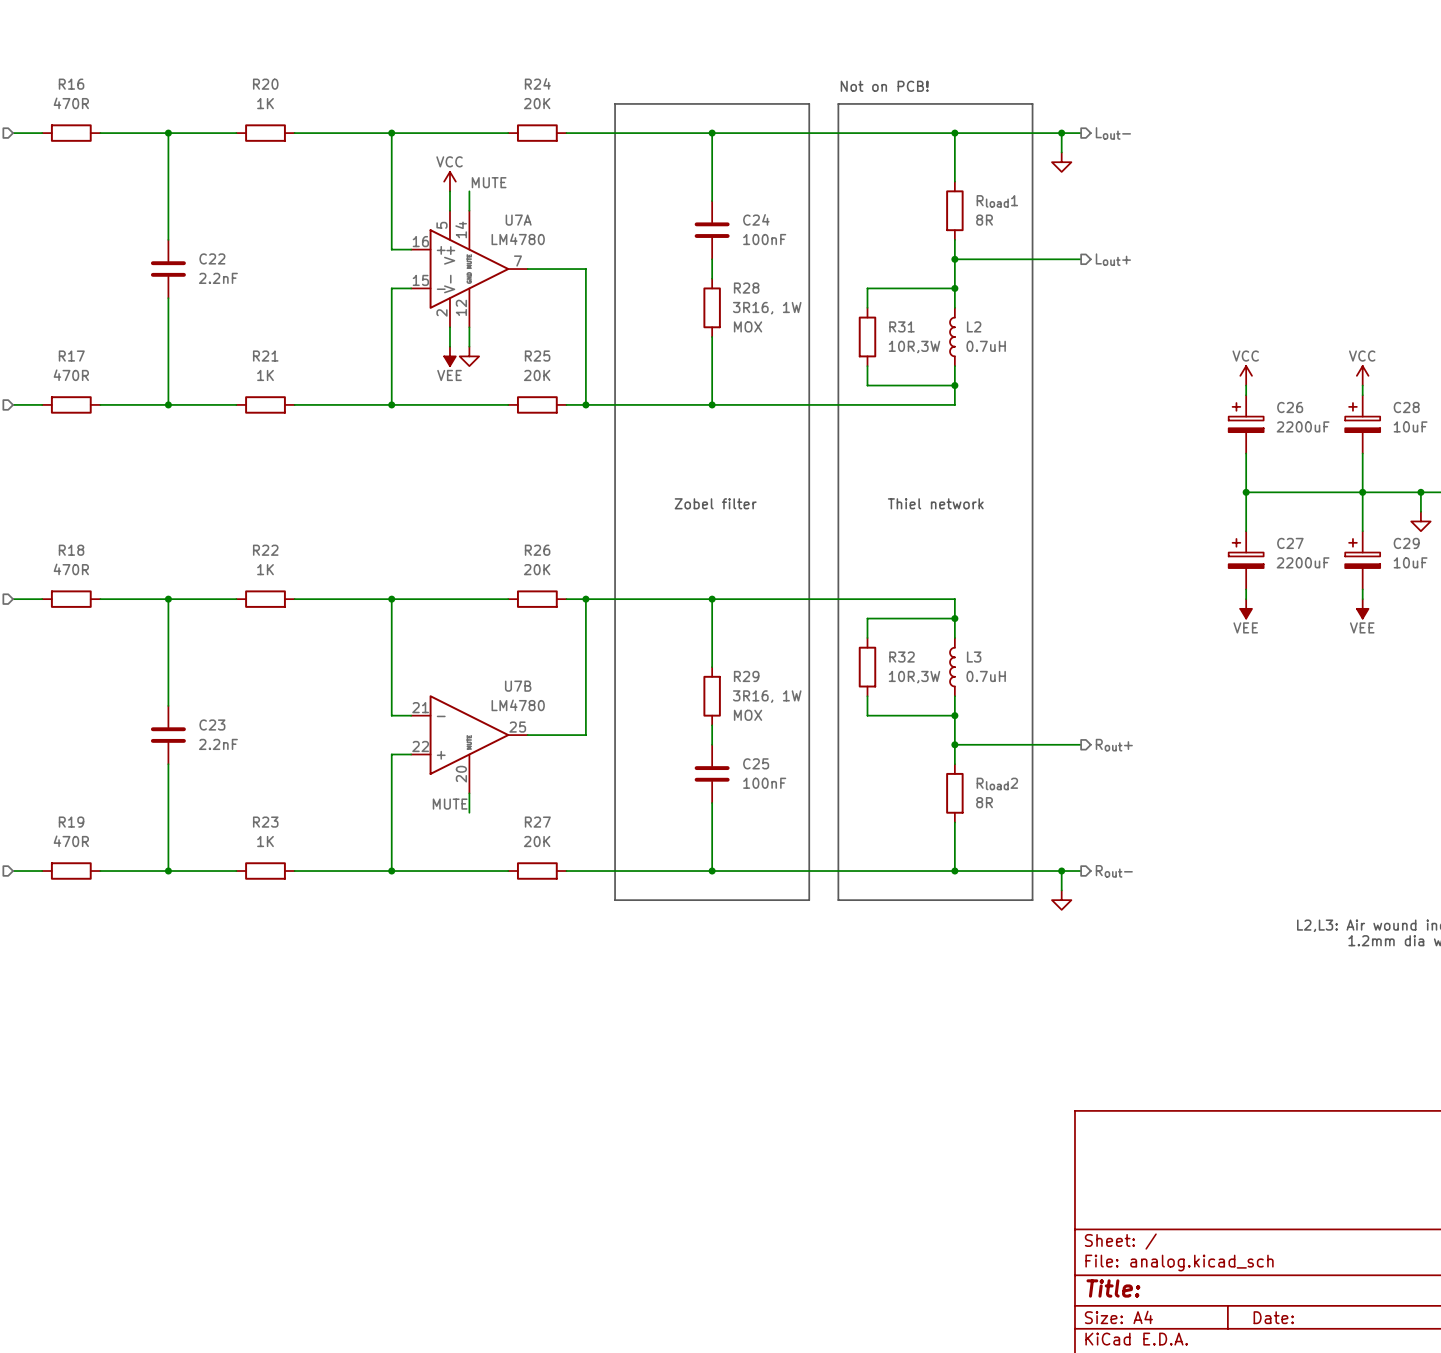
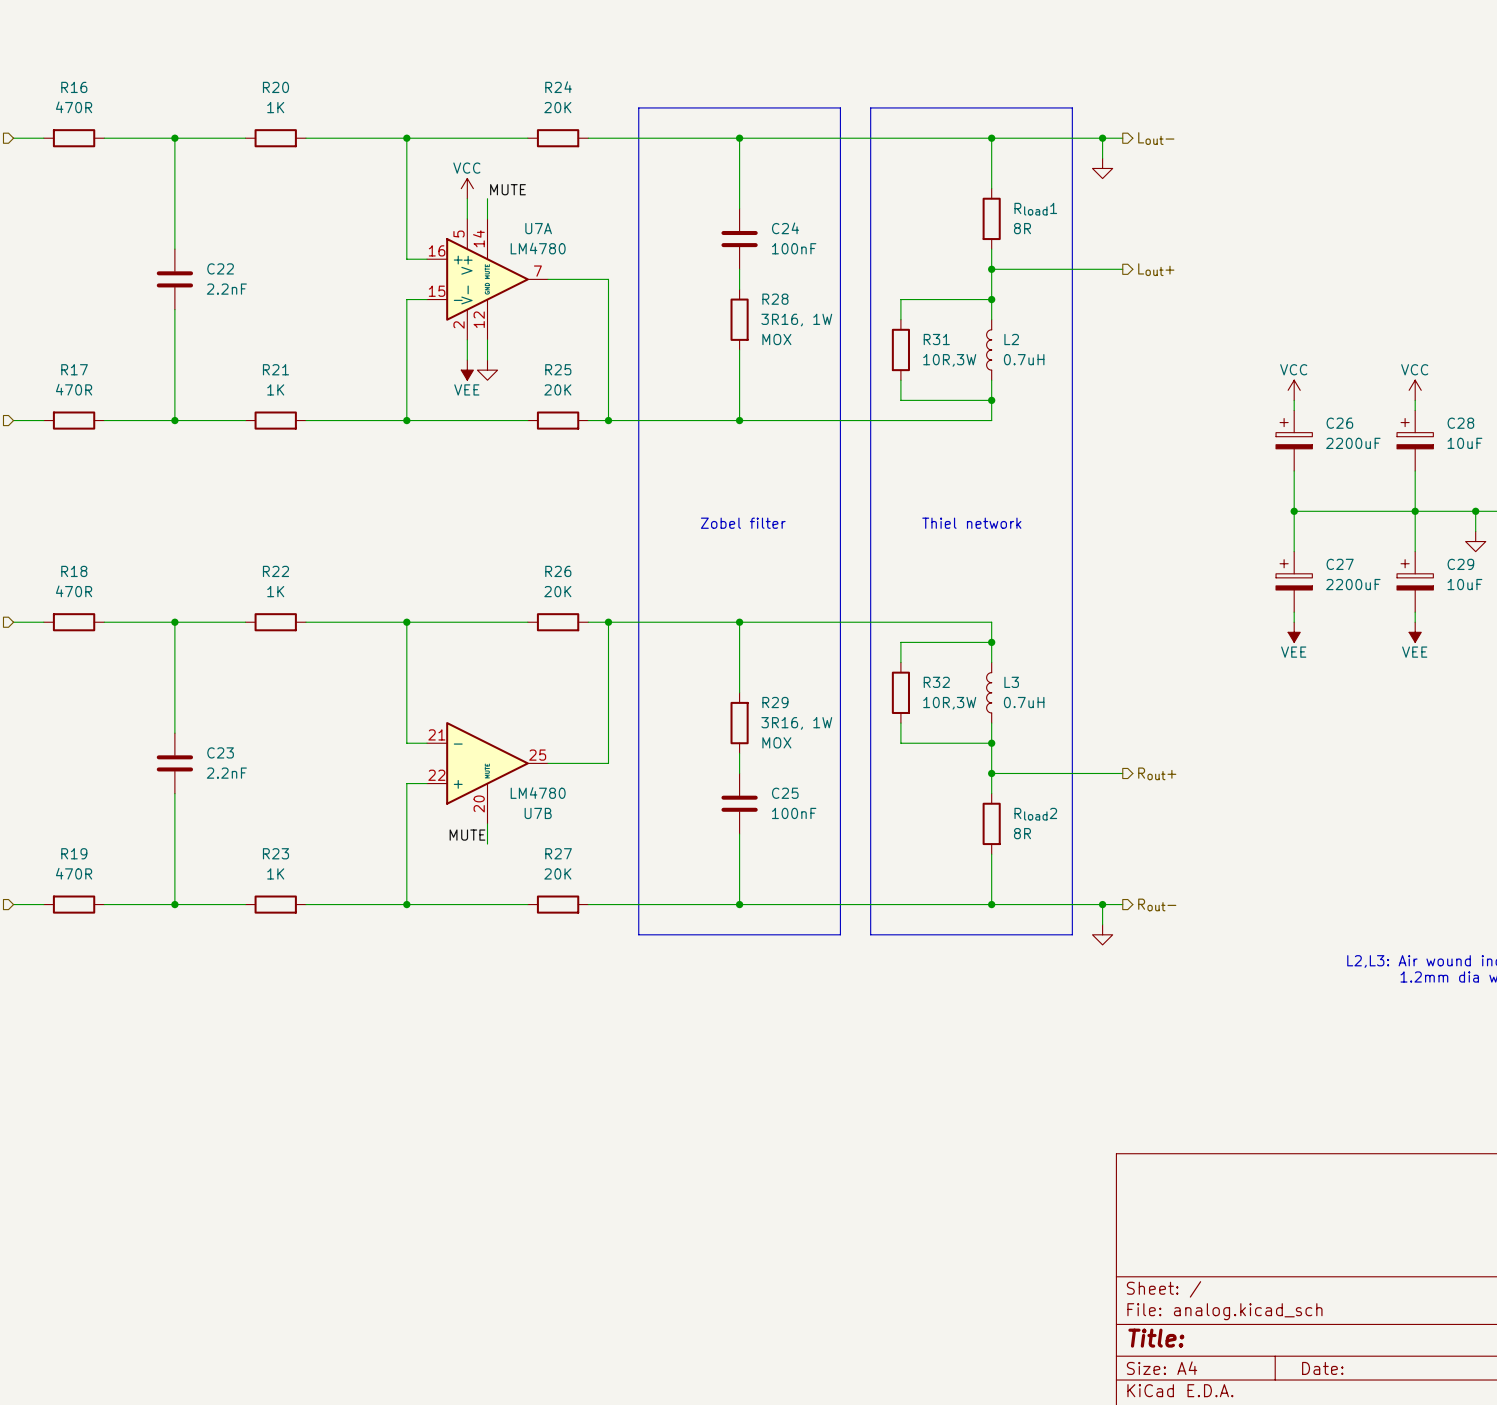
text: Not on PCB! (884, 86) -> none
U7B name position: U7B (518, 686) -> U7B (538, 813)
U7B value position: LM4780 (518, 705) -> LM4780 (538, 793)

